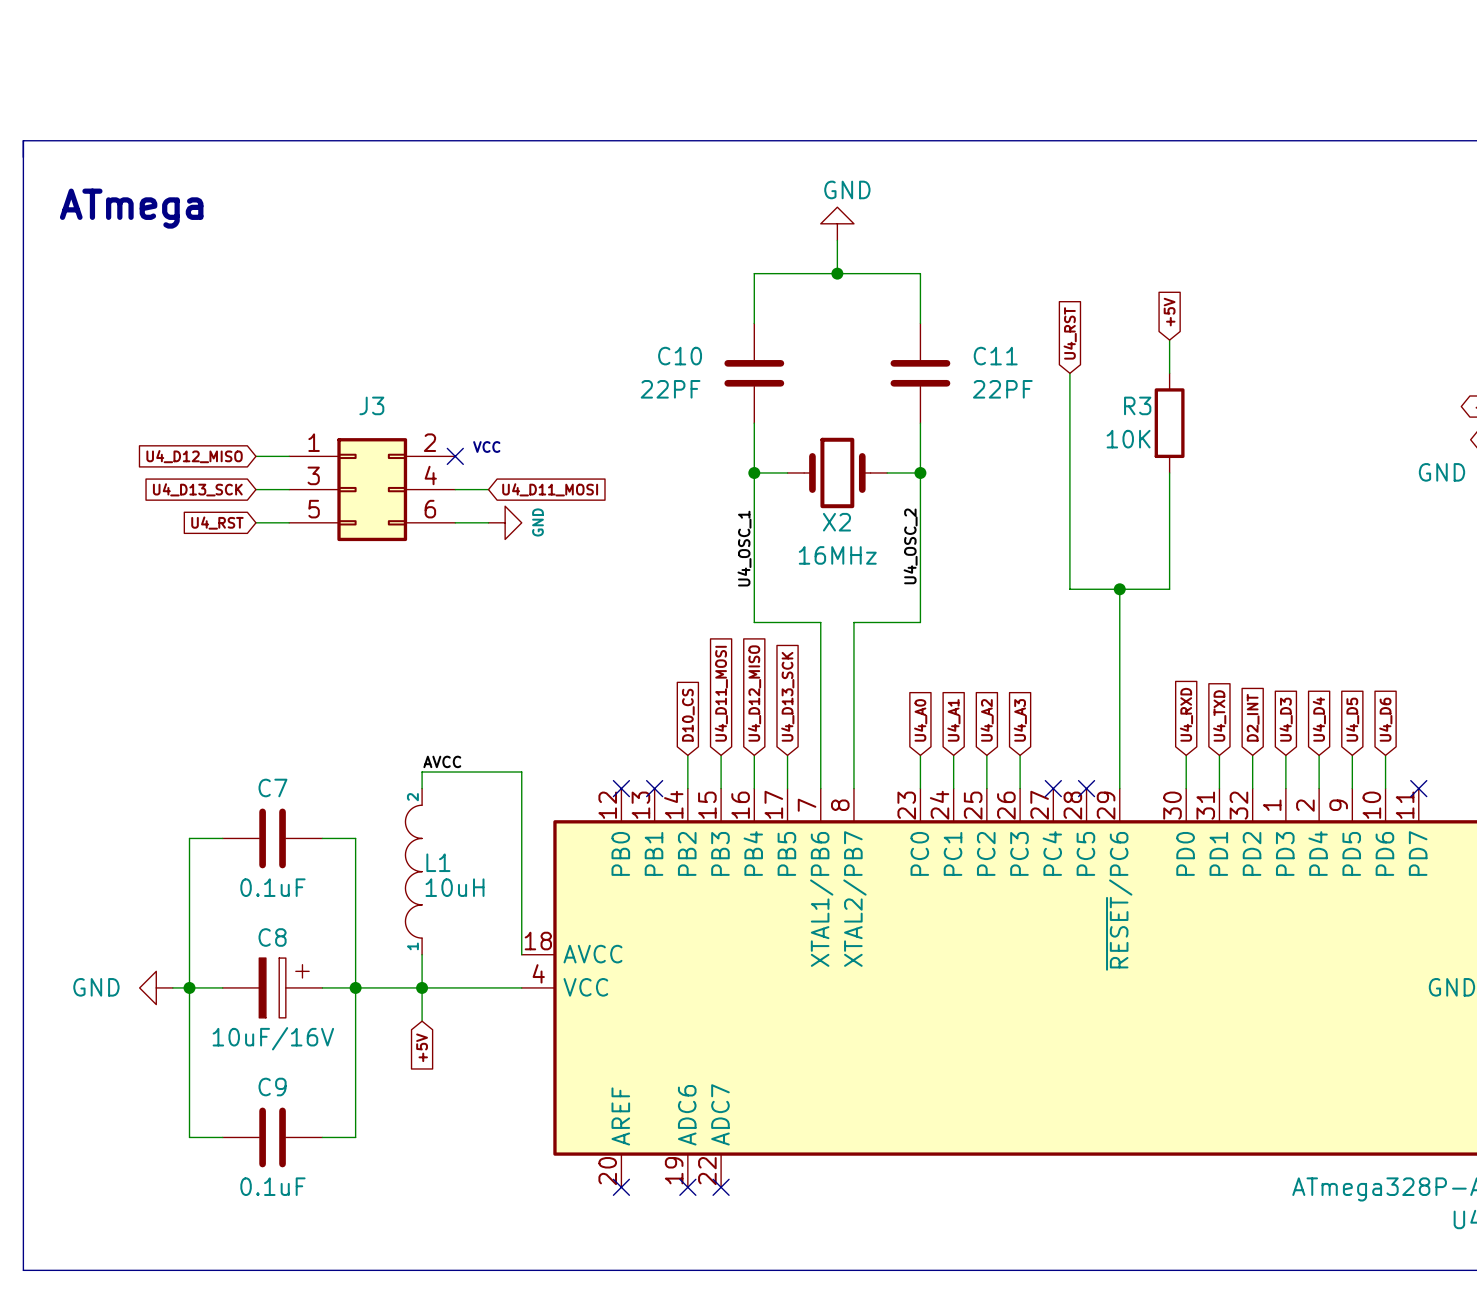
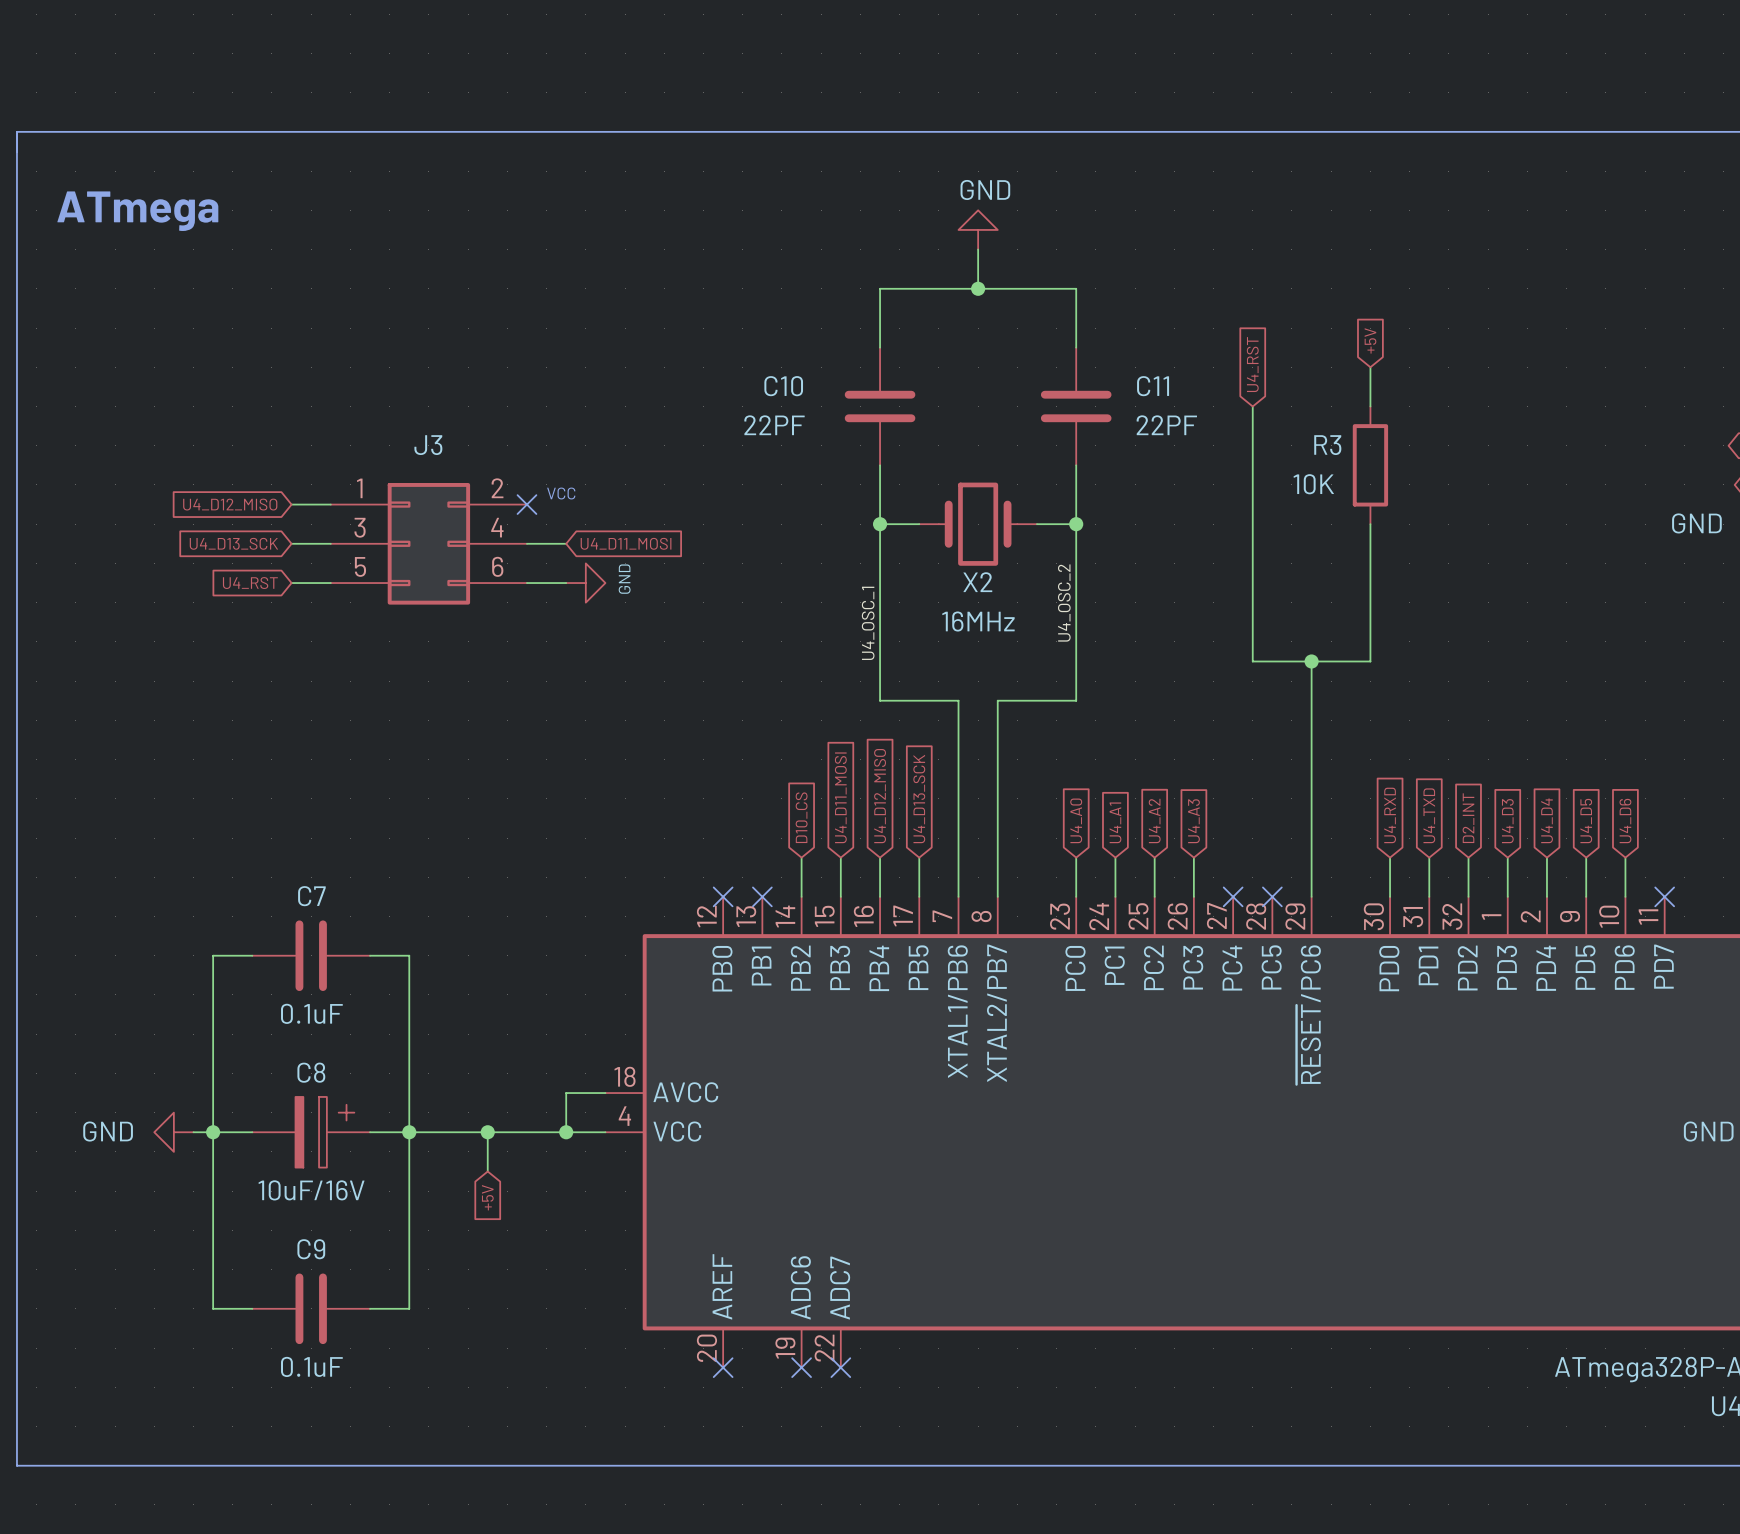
label: AVCC (442, 761) -> none
wire: (422, 788) (422, 772) (521, 772) (521, 954) -> (566, 1132) (566, 1093) (605, 1093)
L1: 10uH (413, 871) -> none
wire: (422, 954) (422, 987) -> none
junction: none -> (566, 1132)

